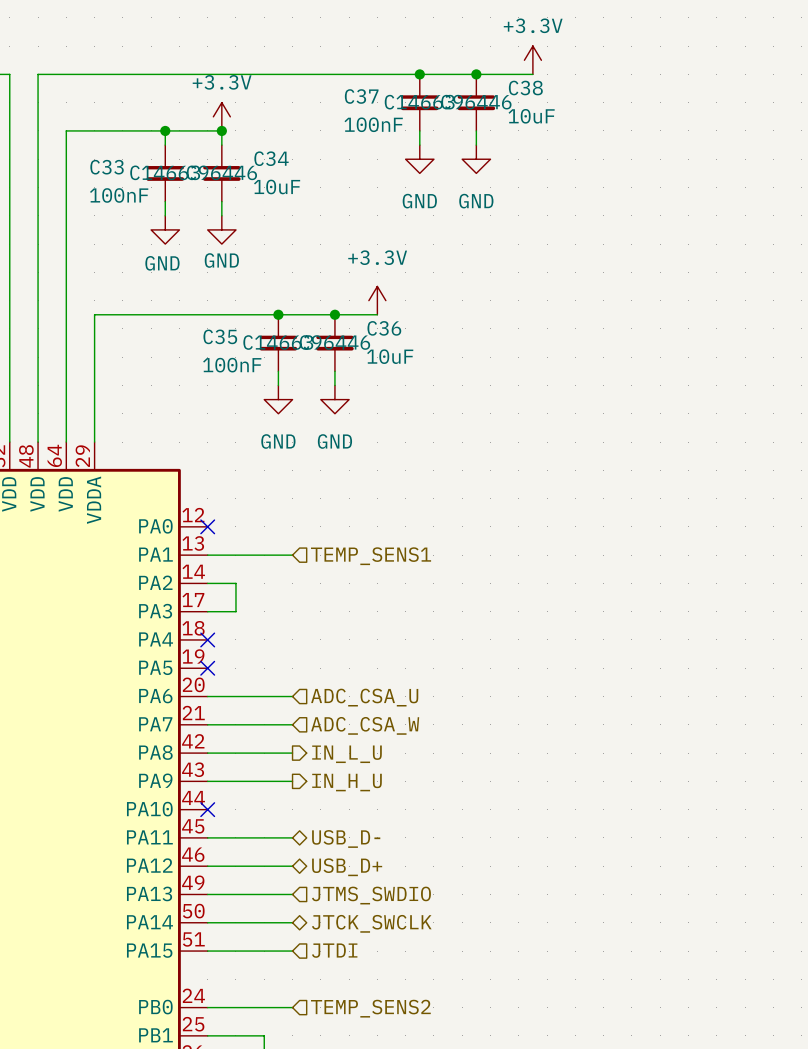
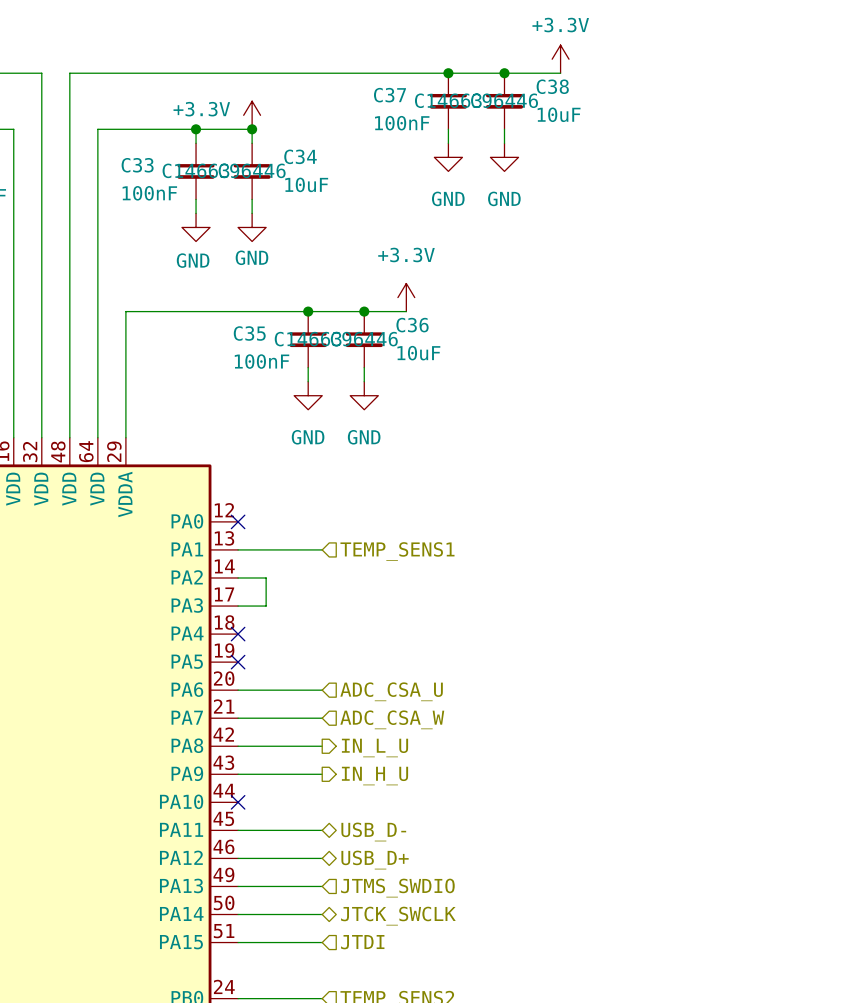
power symbol text position: +3.3V (222, 82) -> +3.3V (201, 109)

